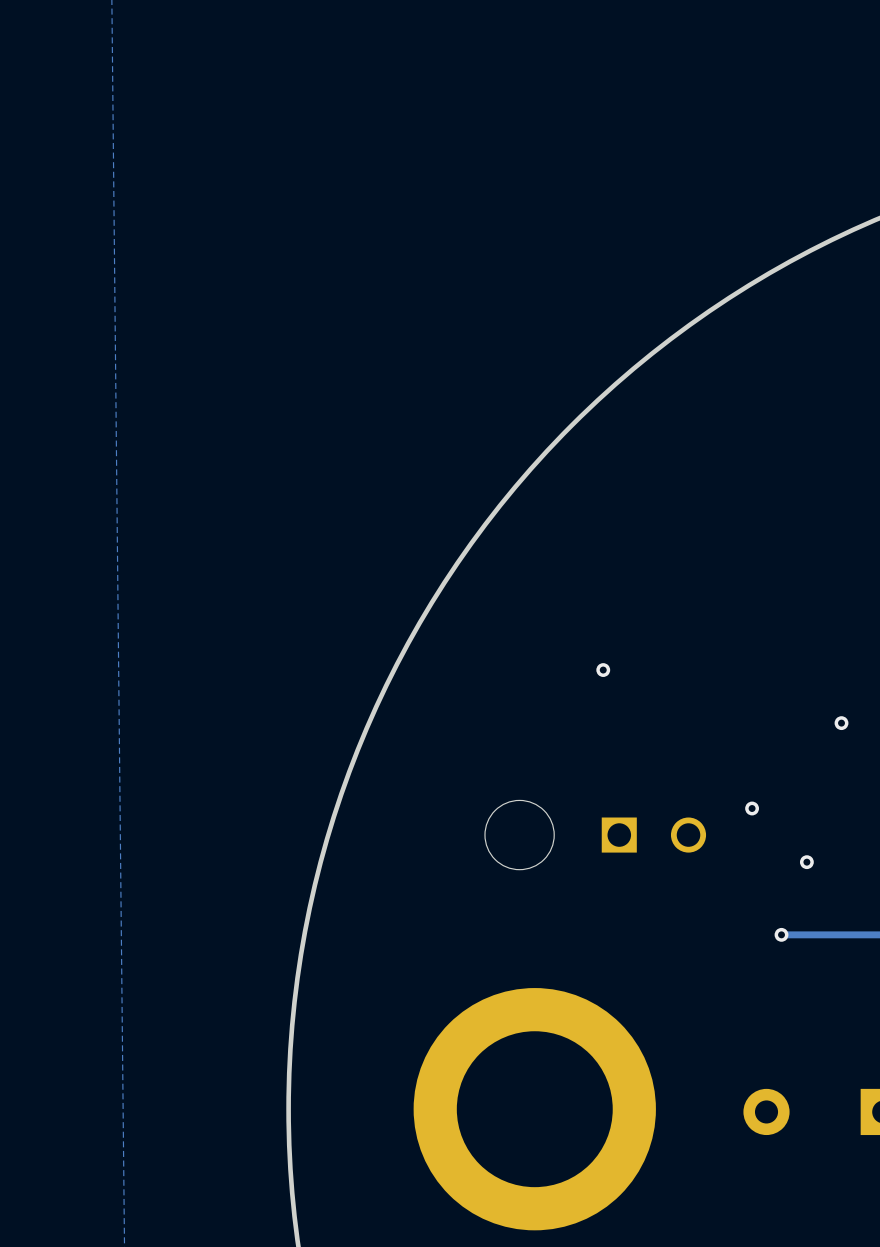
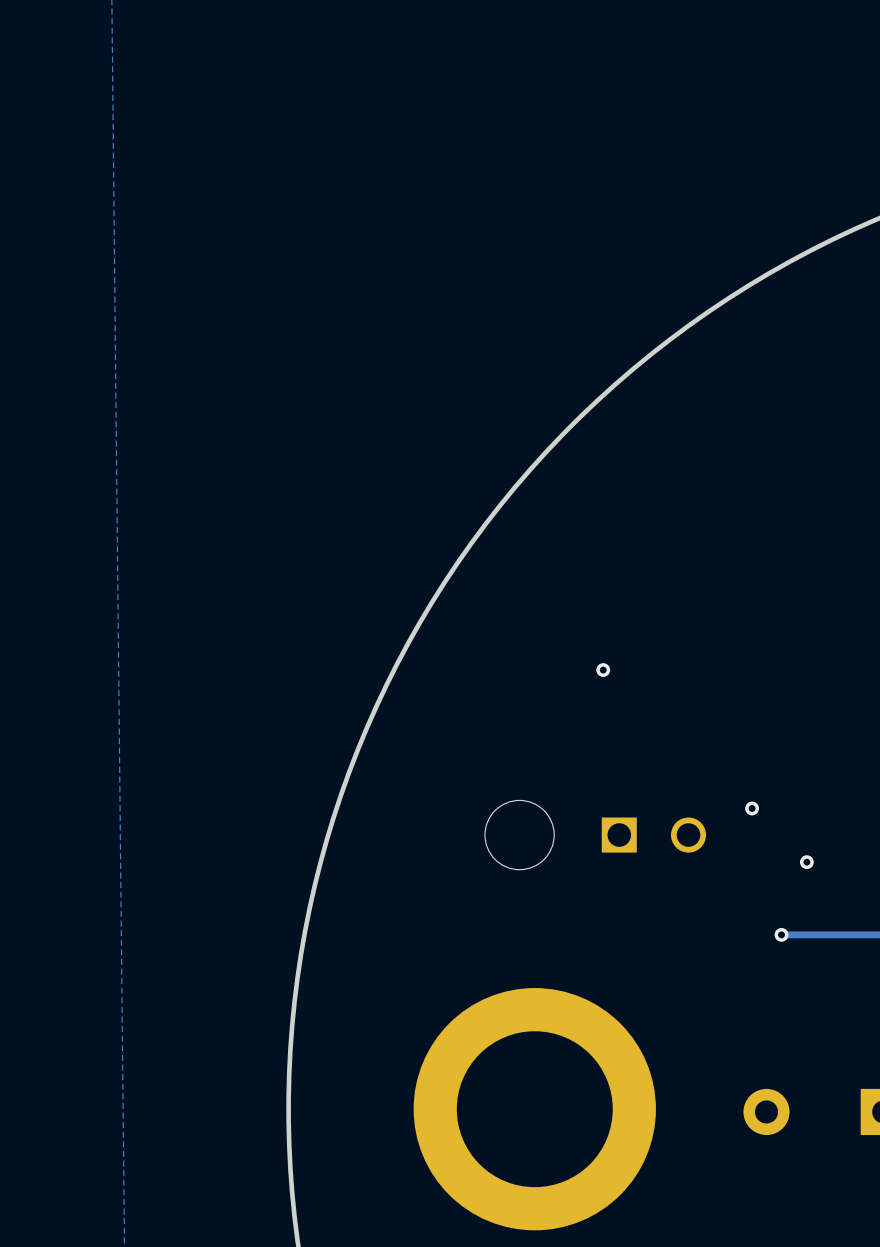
via: (841, 723) -> none

